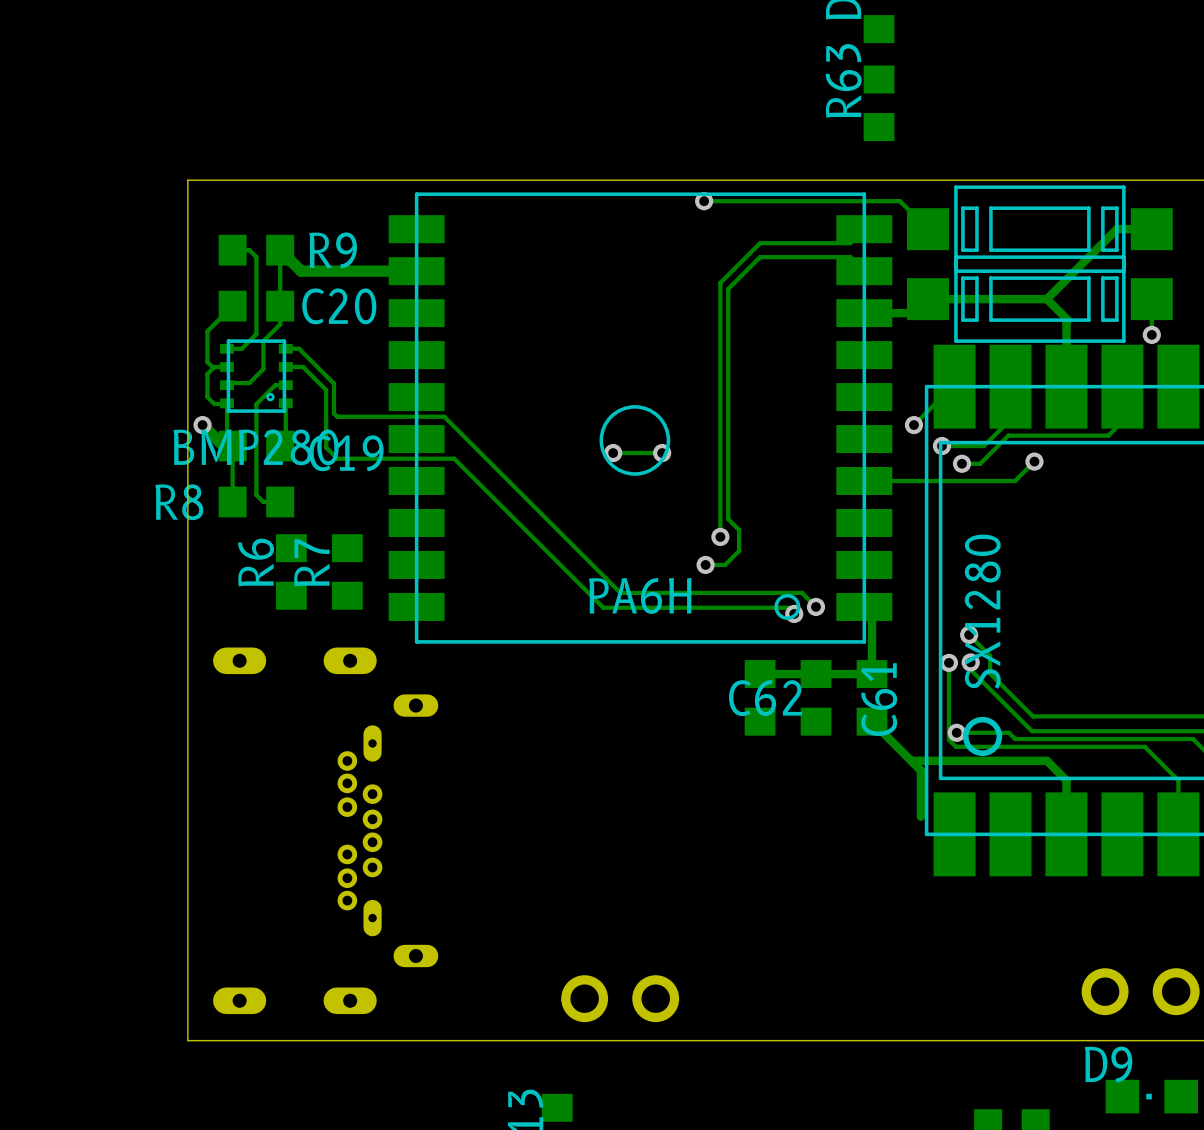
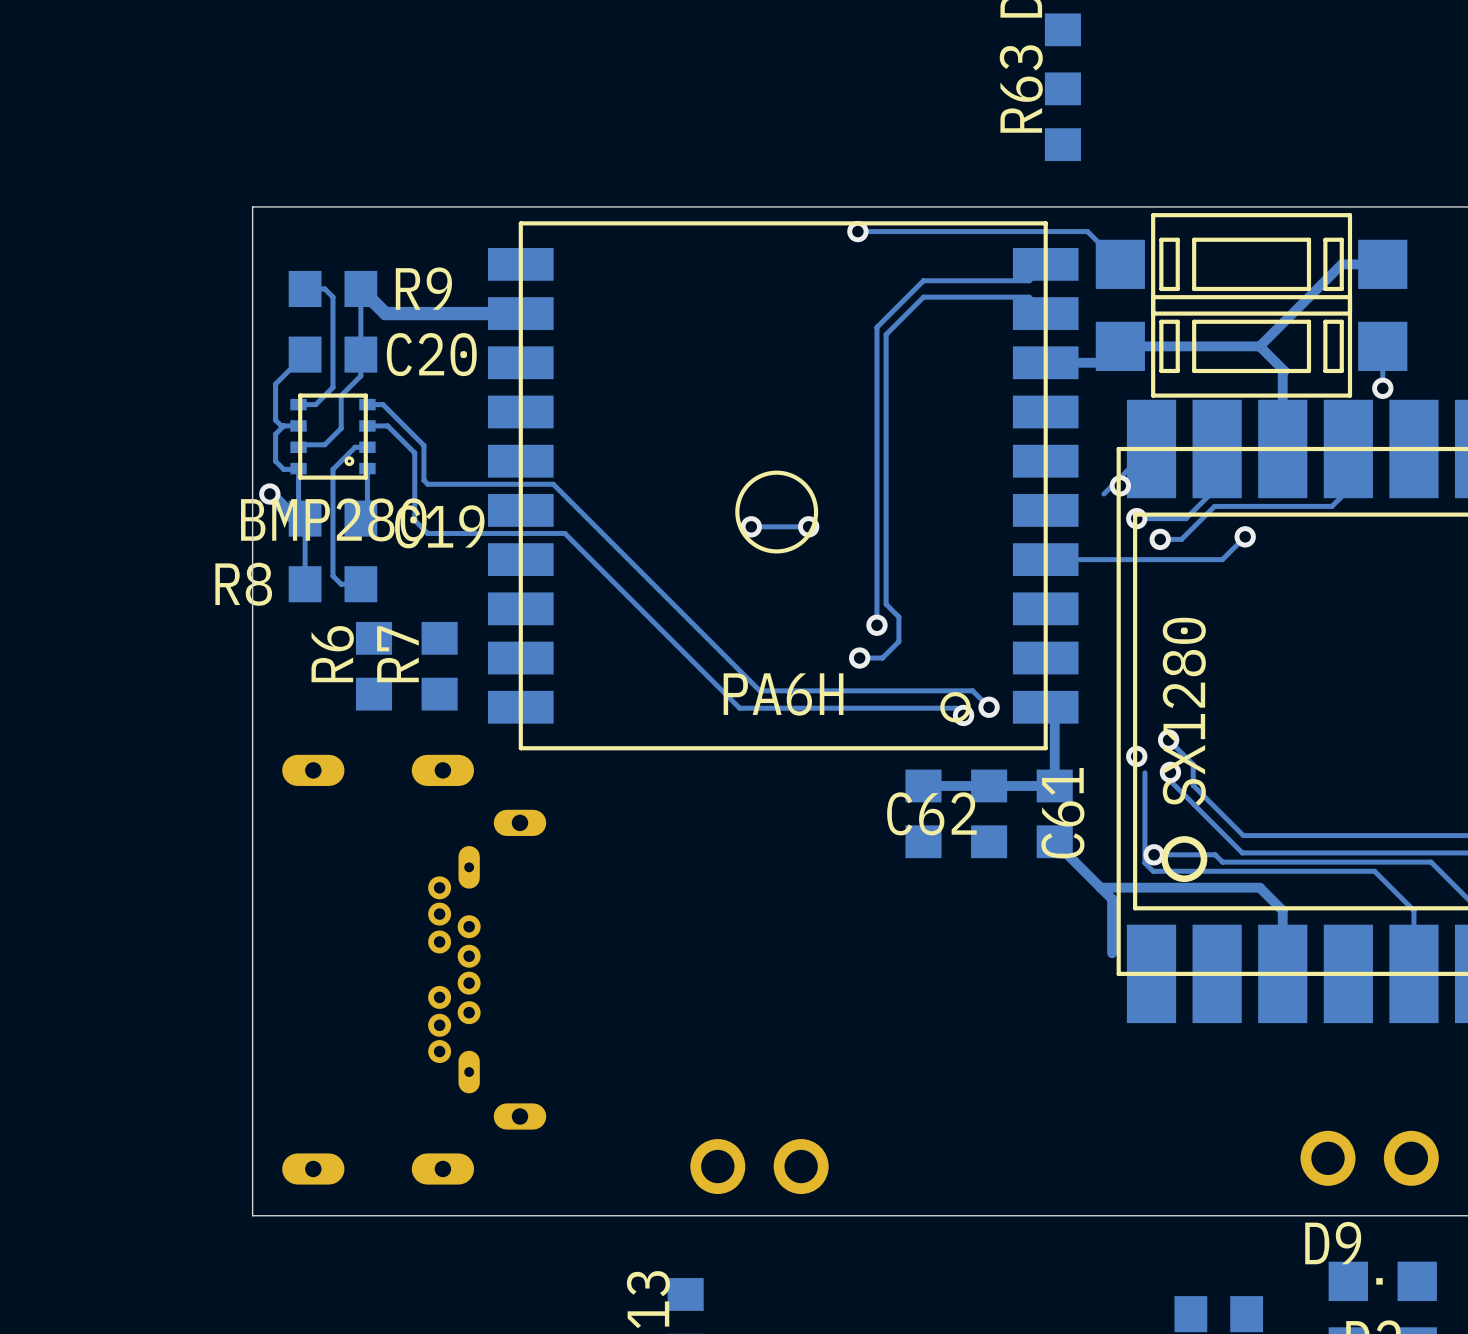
via position: (913, 425) -> (1120, 485)
via position: (948, 662) -> (1136, 756)

